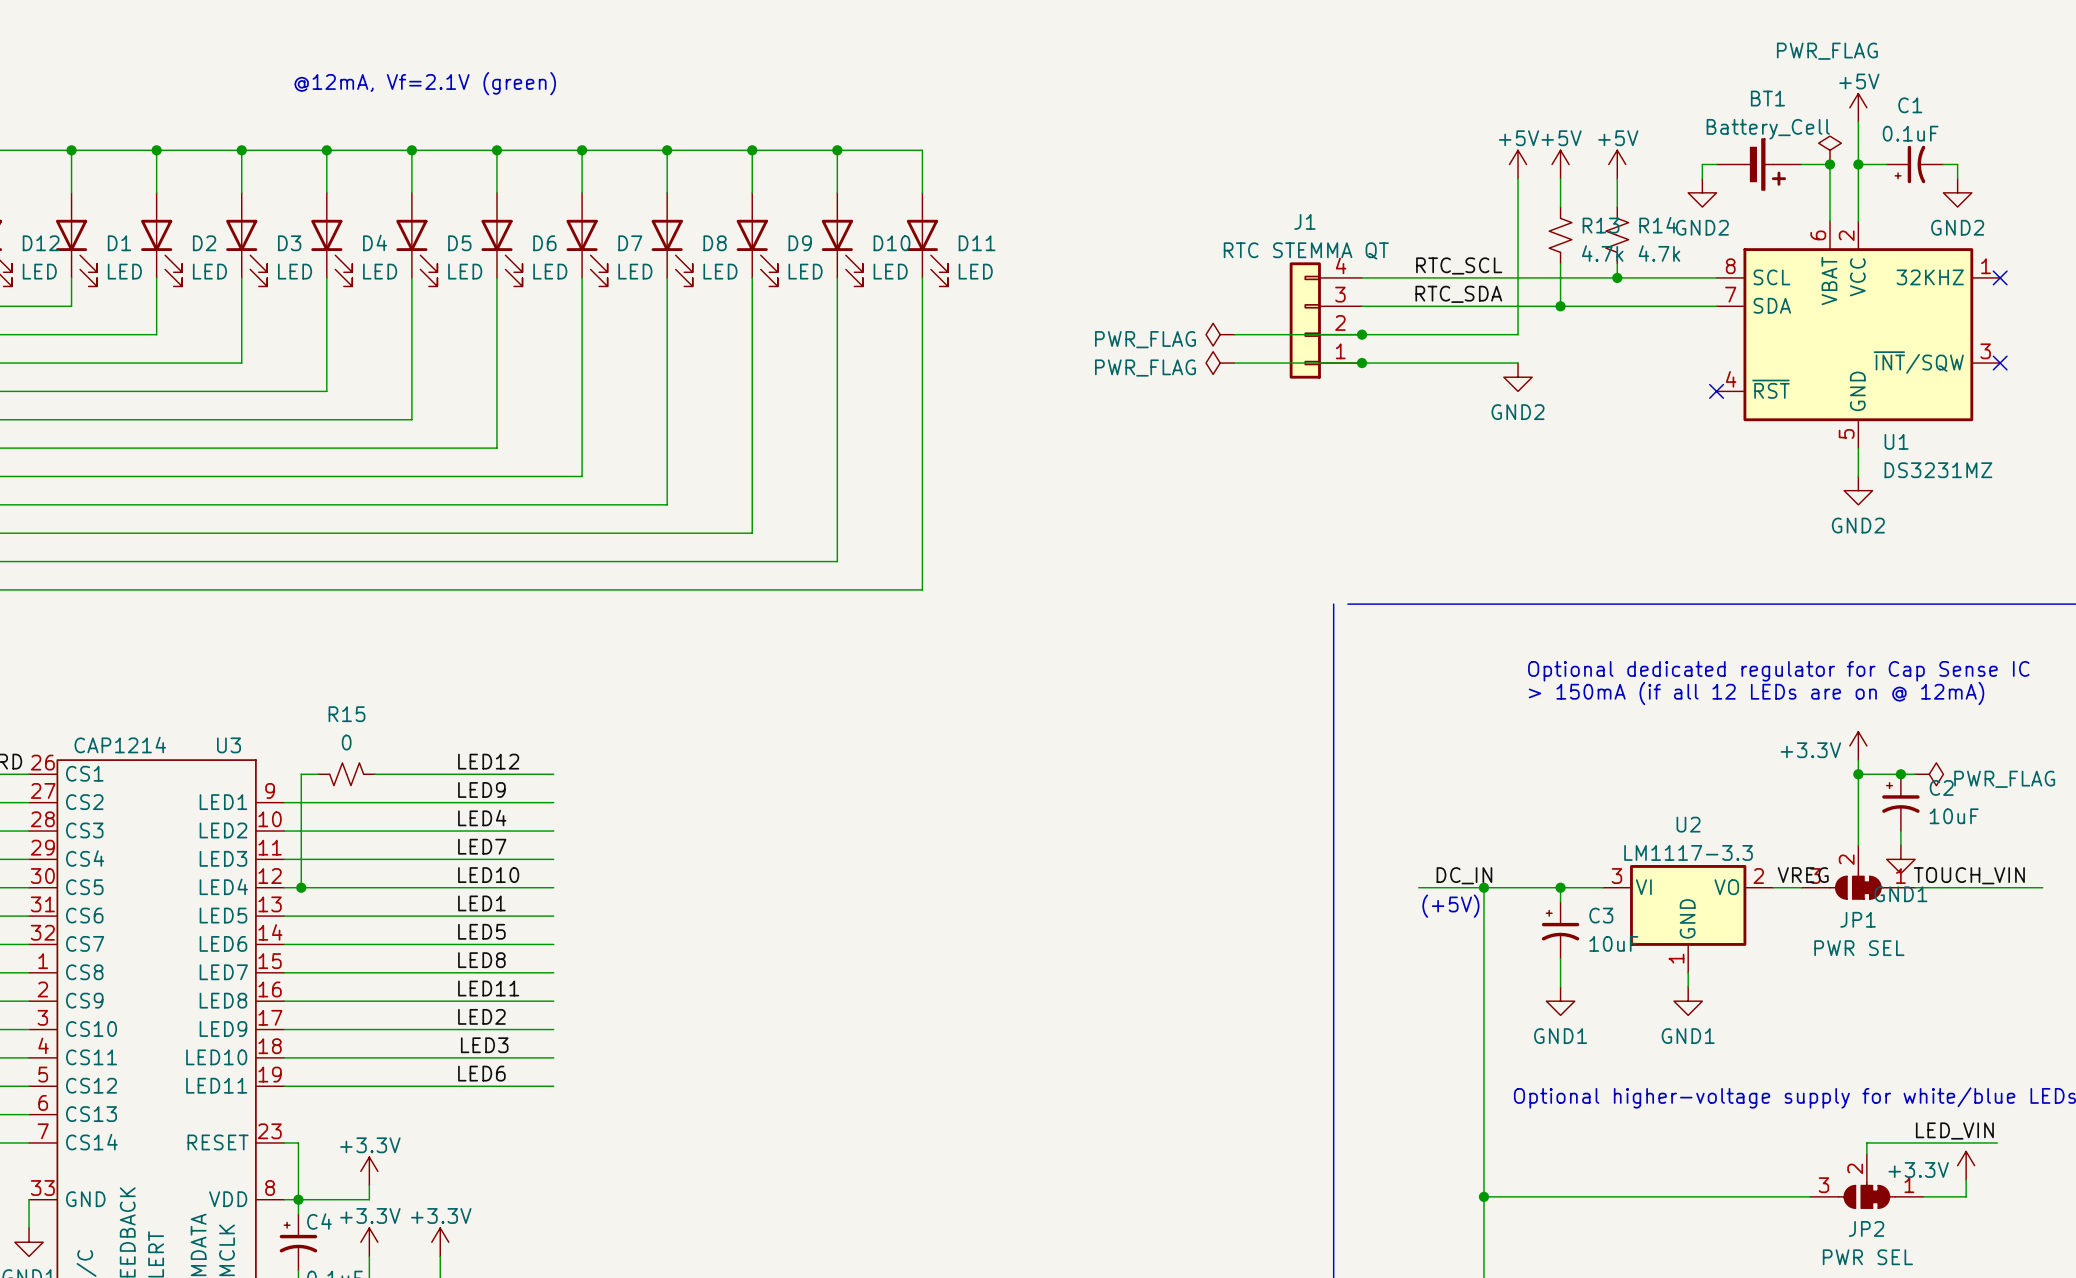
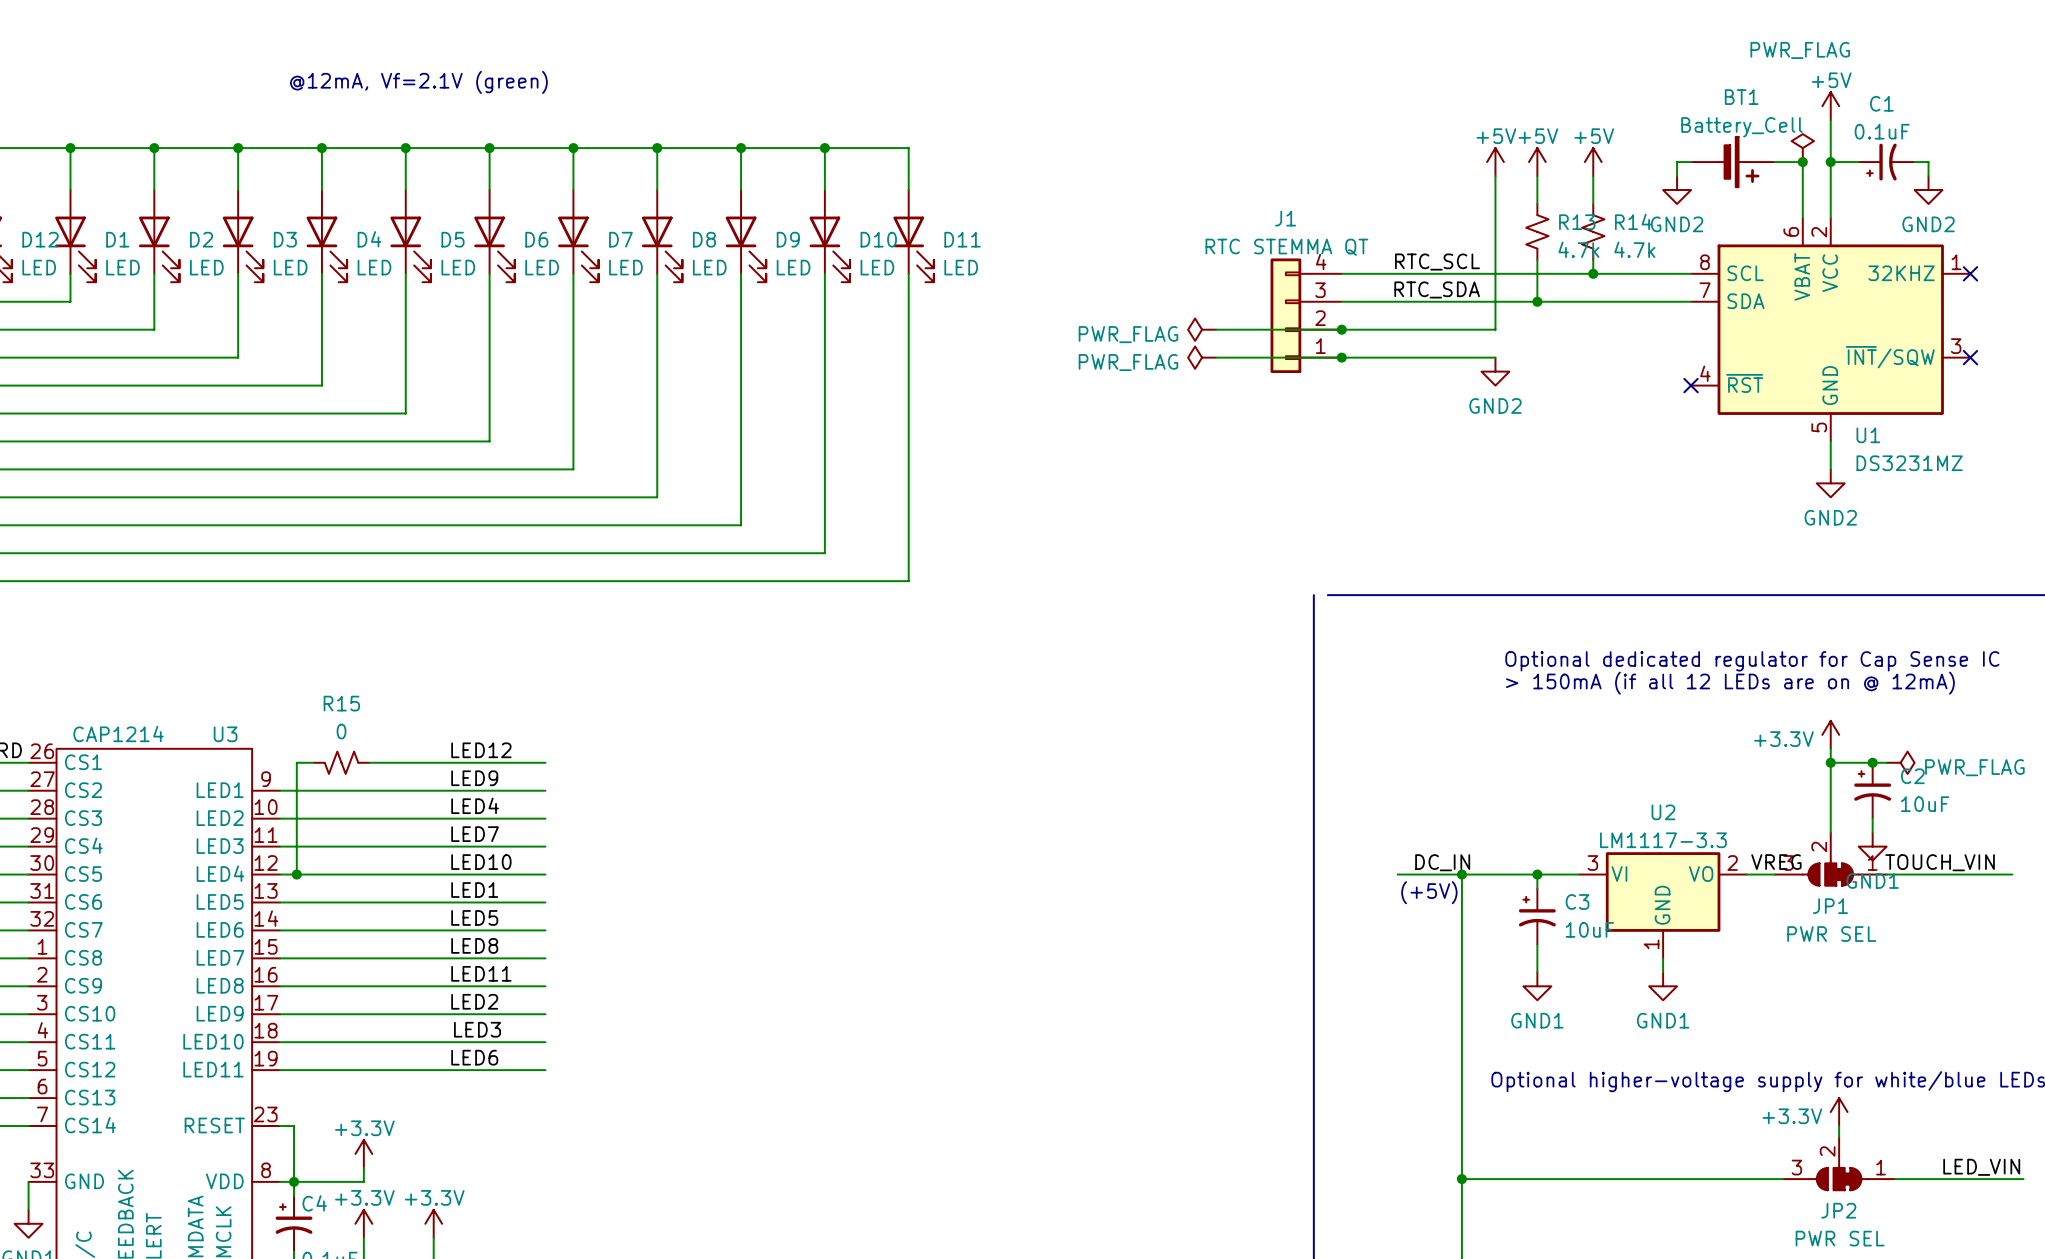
label position: LED_VIN (1954, 1131) -> LED_VIN (1981, 1167)
wire: (1866, 1142) (1997, 1142) -> none
power symbol position: +3.3V (1966, 1165) -> +3.3V (1839, 1112)
wire: (1966, 1179) (1966, 1196) -> (2023, 1179) (1936, 1179)

